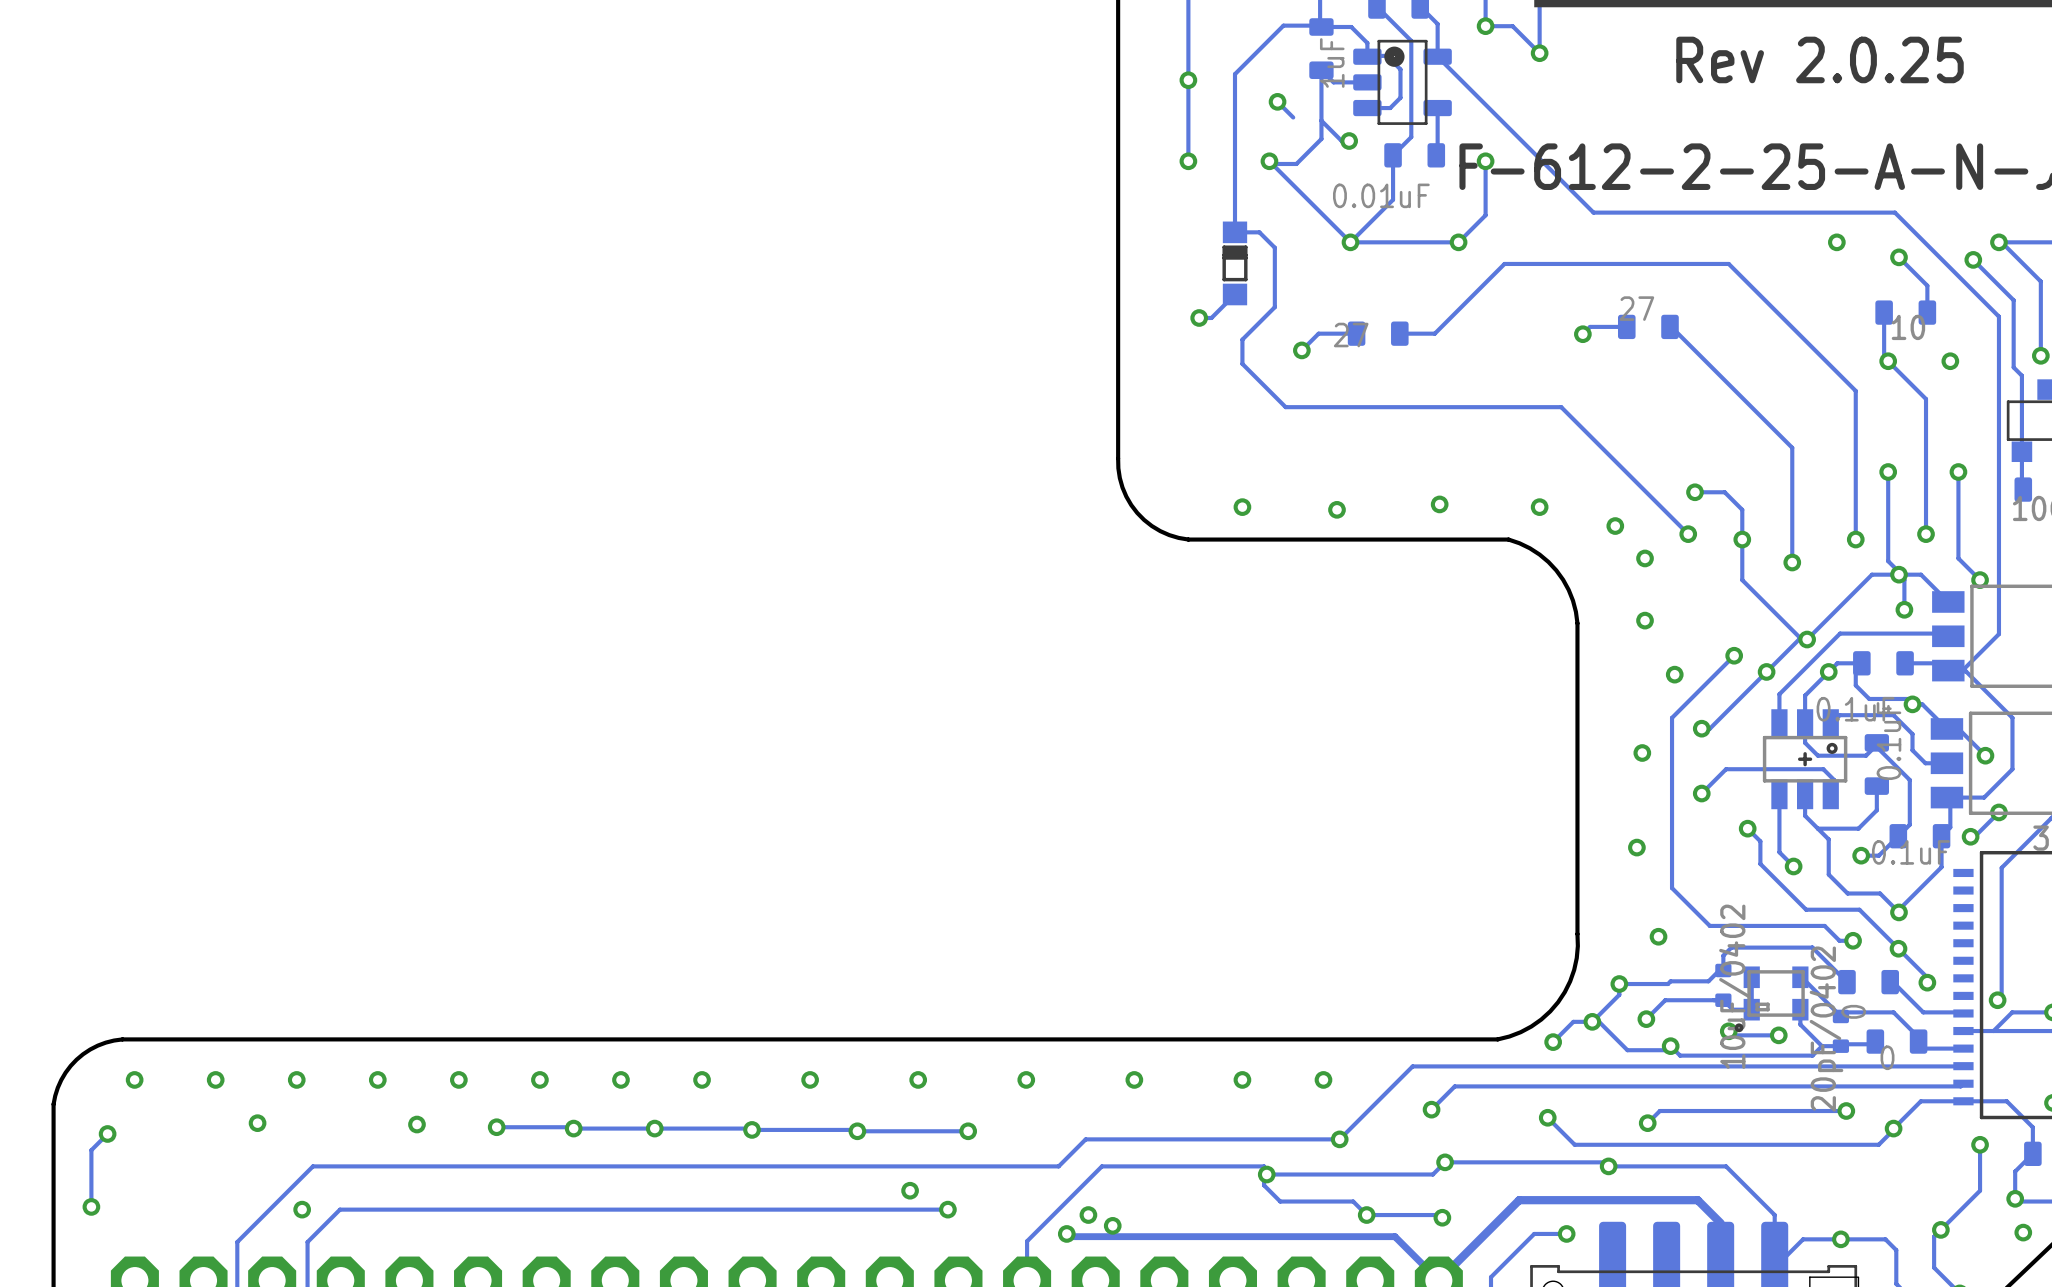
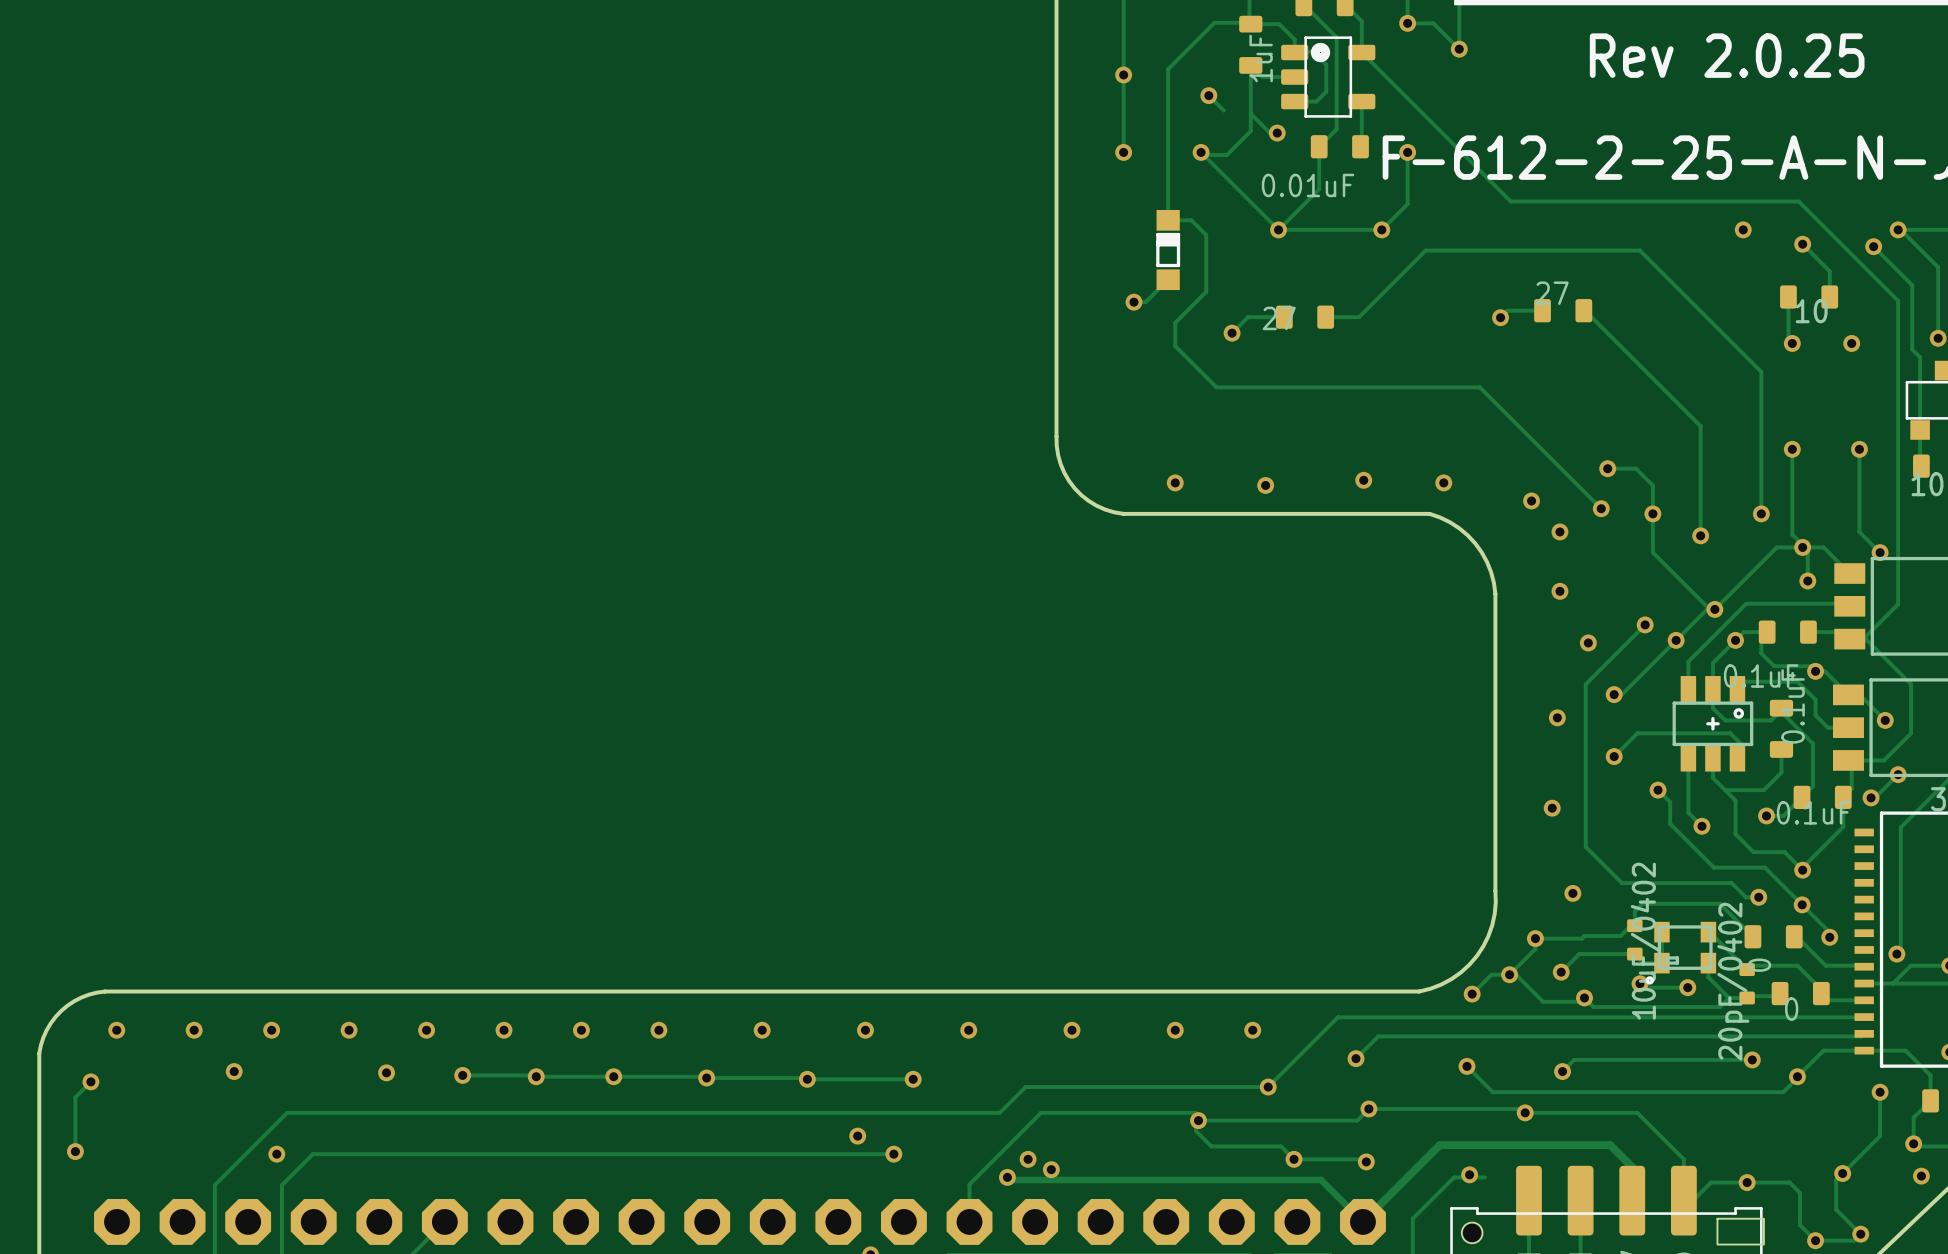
track: (1888, 361) (1926, 399) (1926, 534) -> none
via position: (1539, 507) -> (1443, 482)
via: (1926, 534) -> none
via position: (1566, 1233) -> (1469, 1174)

